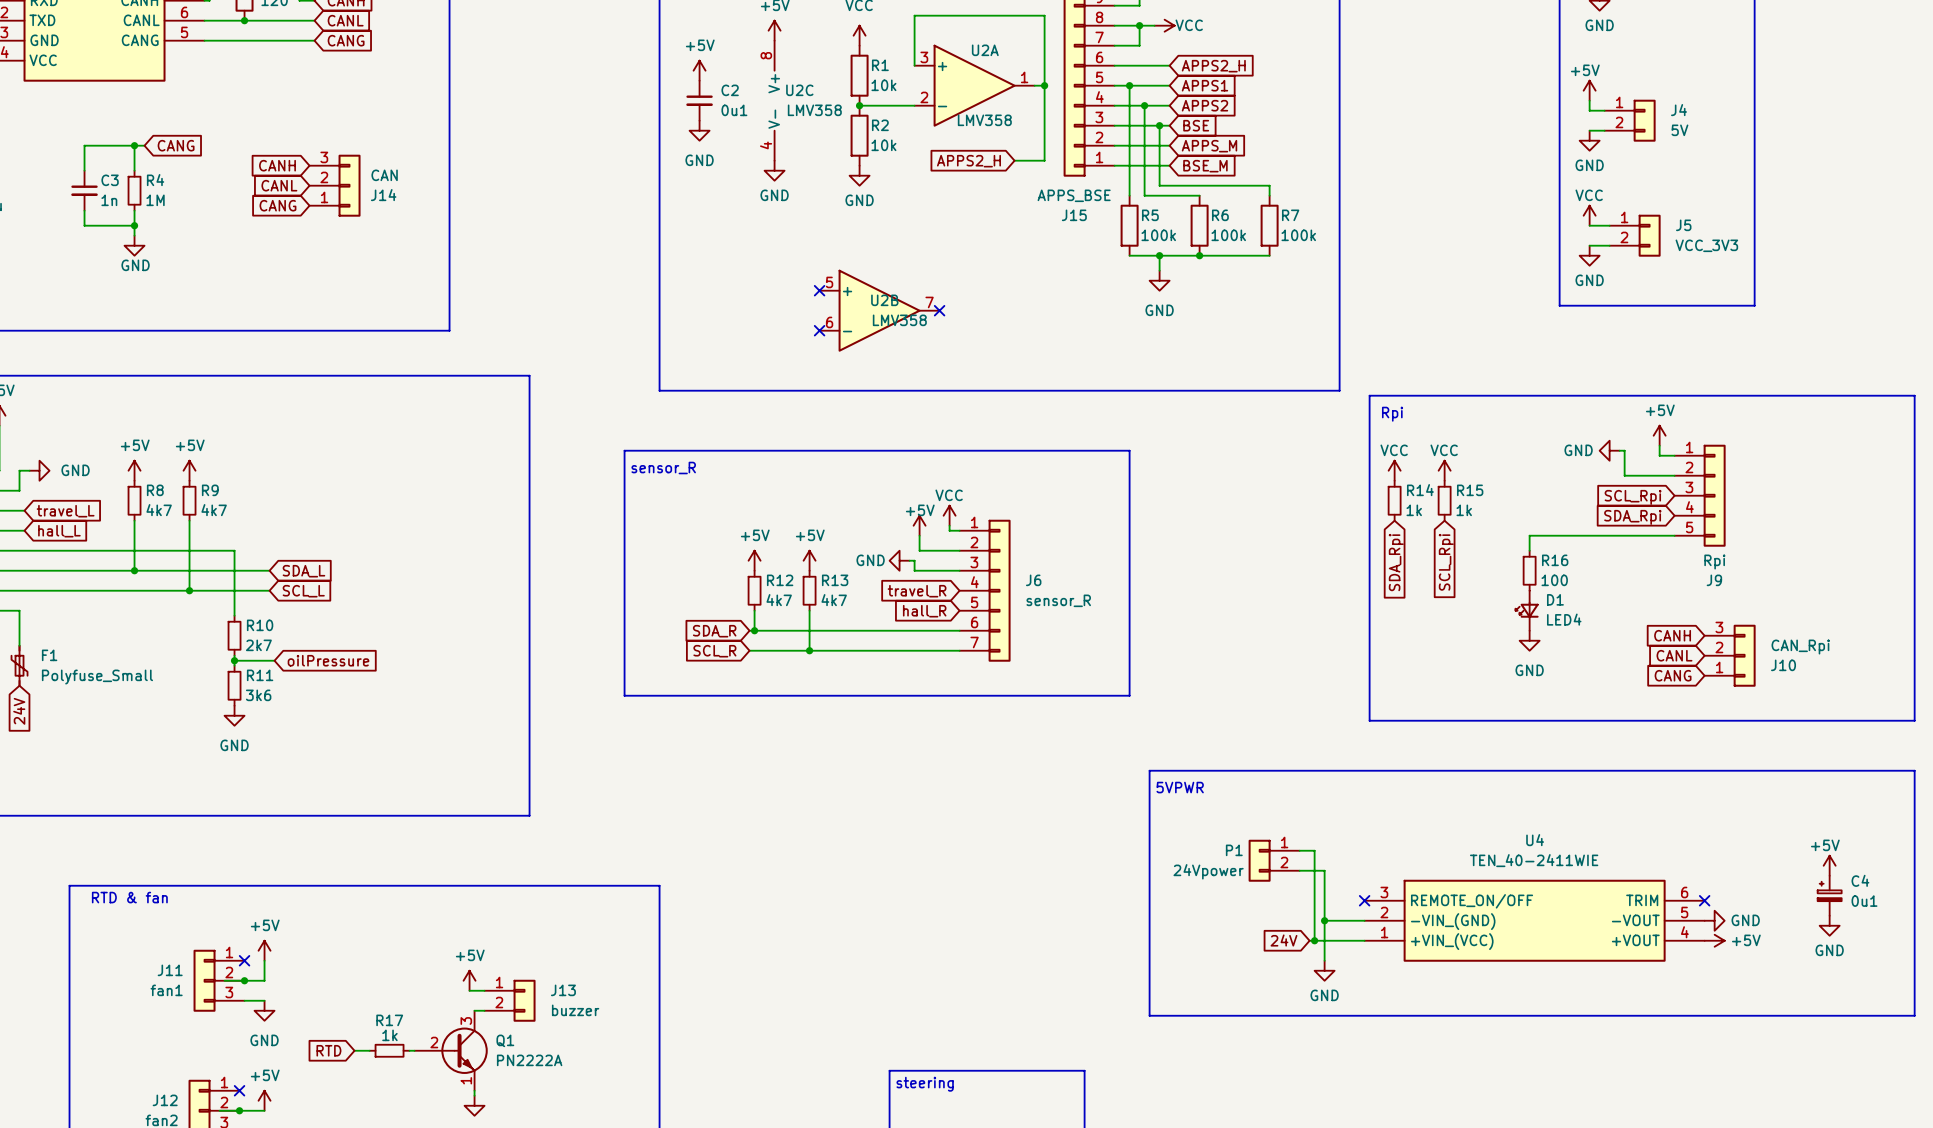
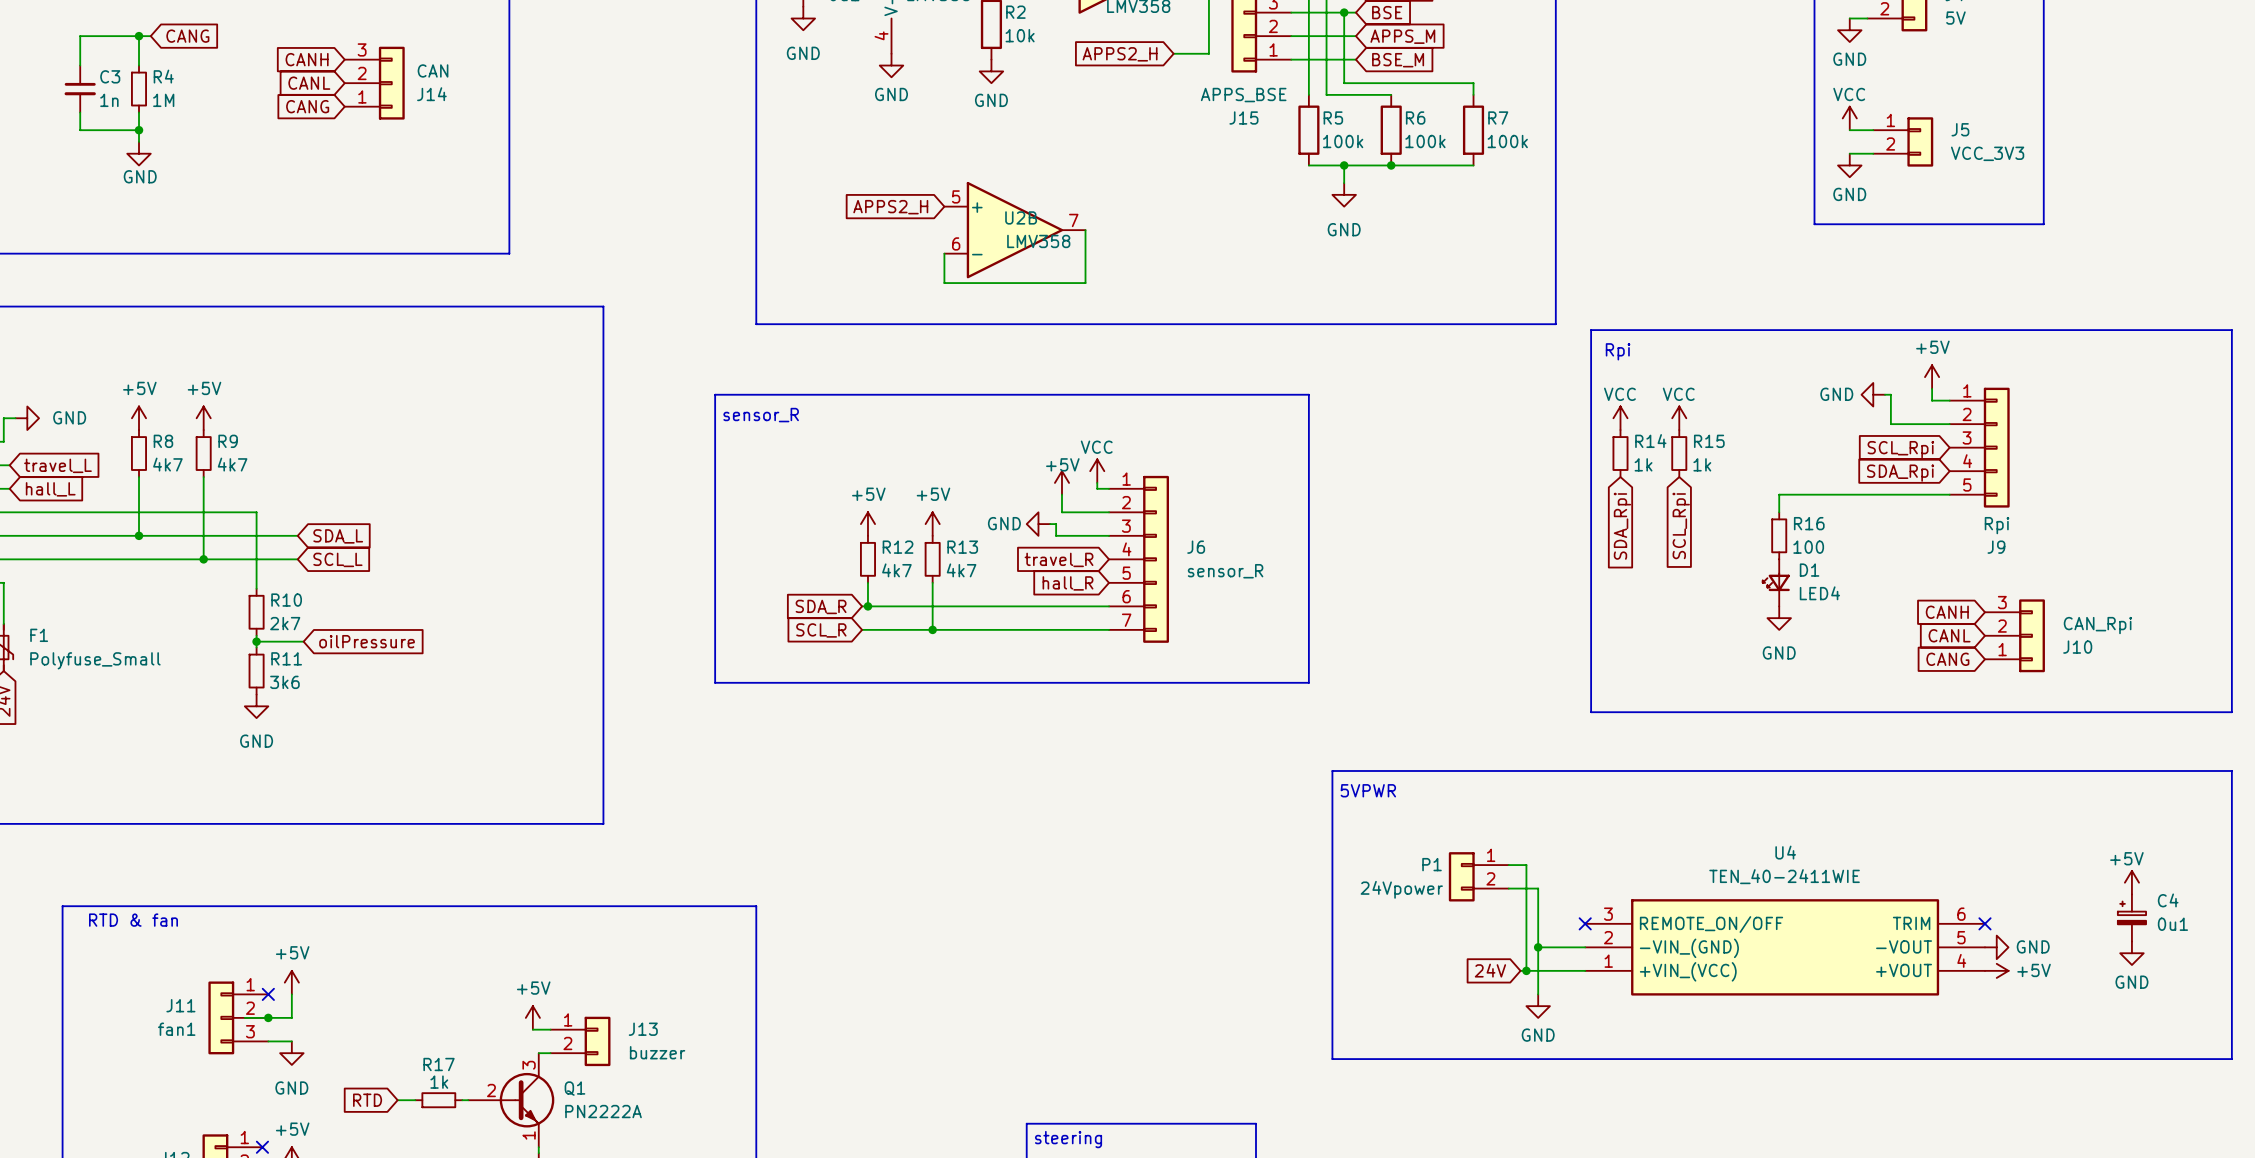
no-connect mark: (819, 290) -> none
global label: none -> APPS2_H (890, 207)
wire: none -> (1085, 230) (1085, 283) (944, 283) (944, 253)
no-connect mark: (939, 310) -> none
no-connect mark: (819, 330) -> none

